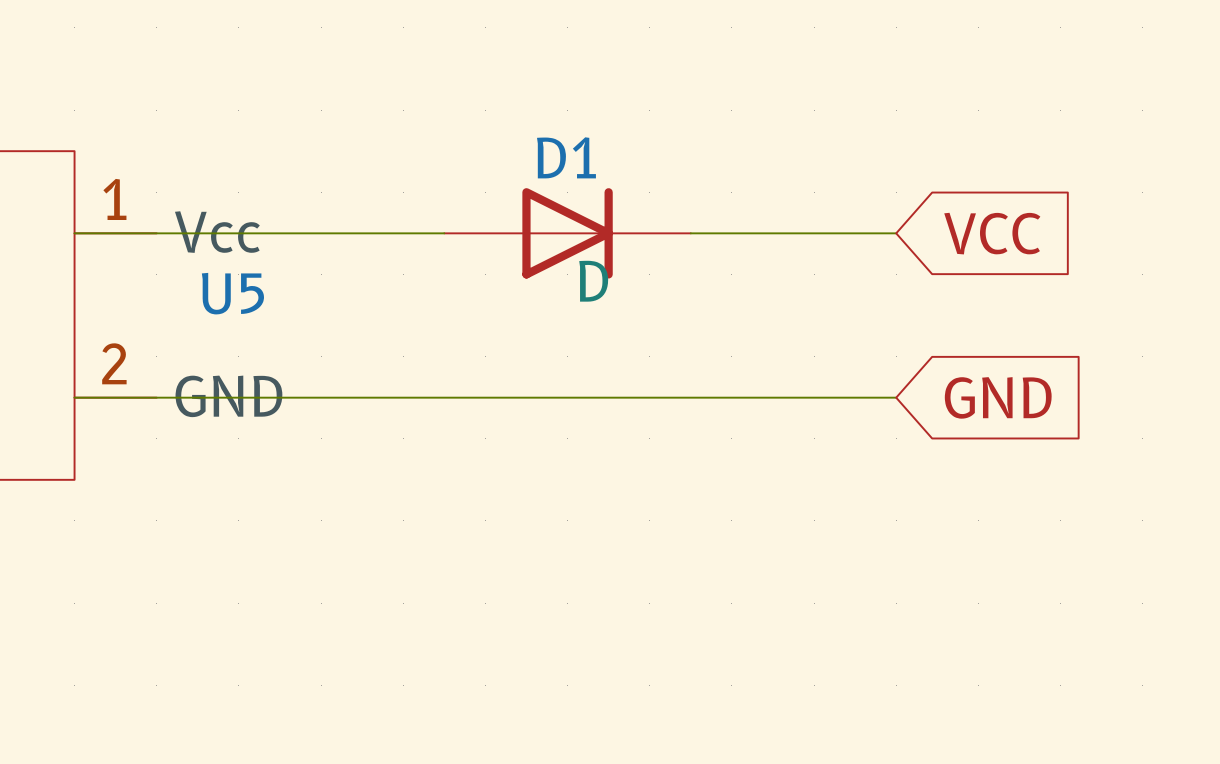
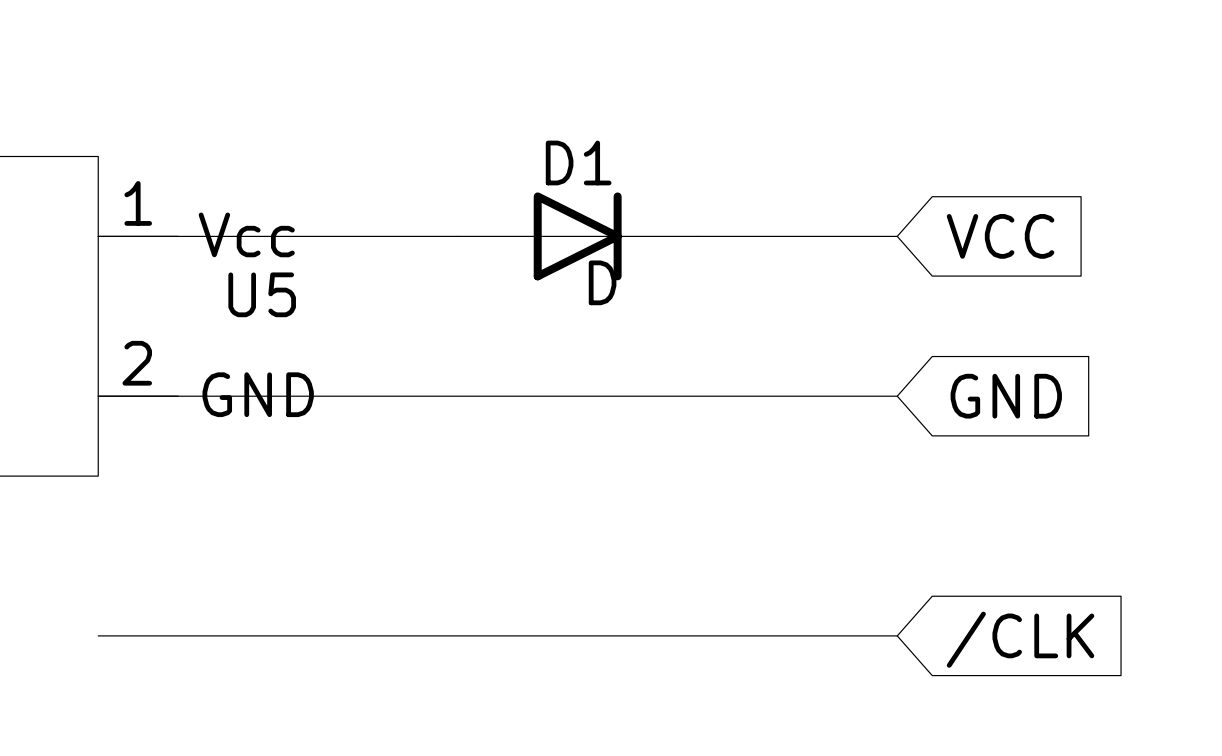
wire: none -> (98, 635) (897, 635)
global label: none -> /CLK (1020, 639)

